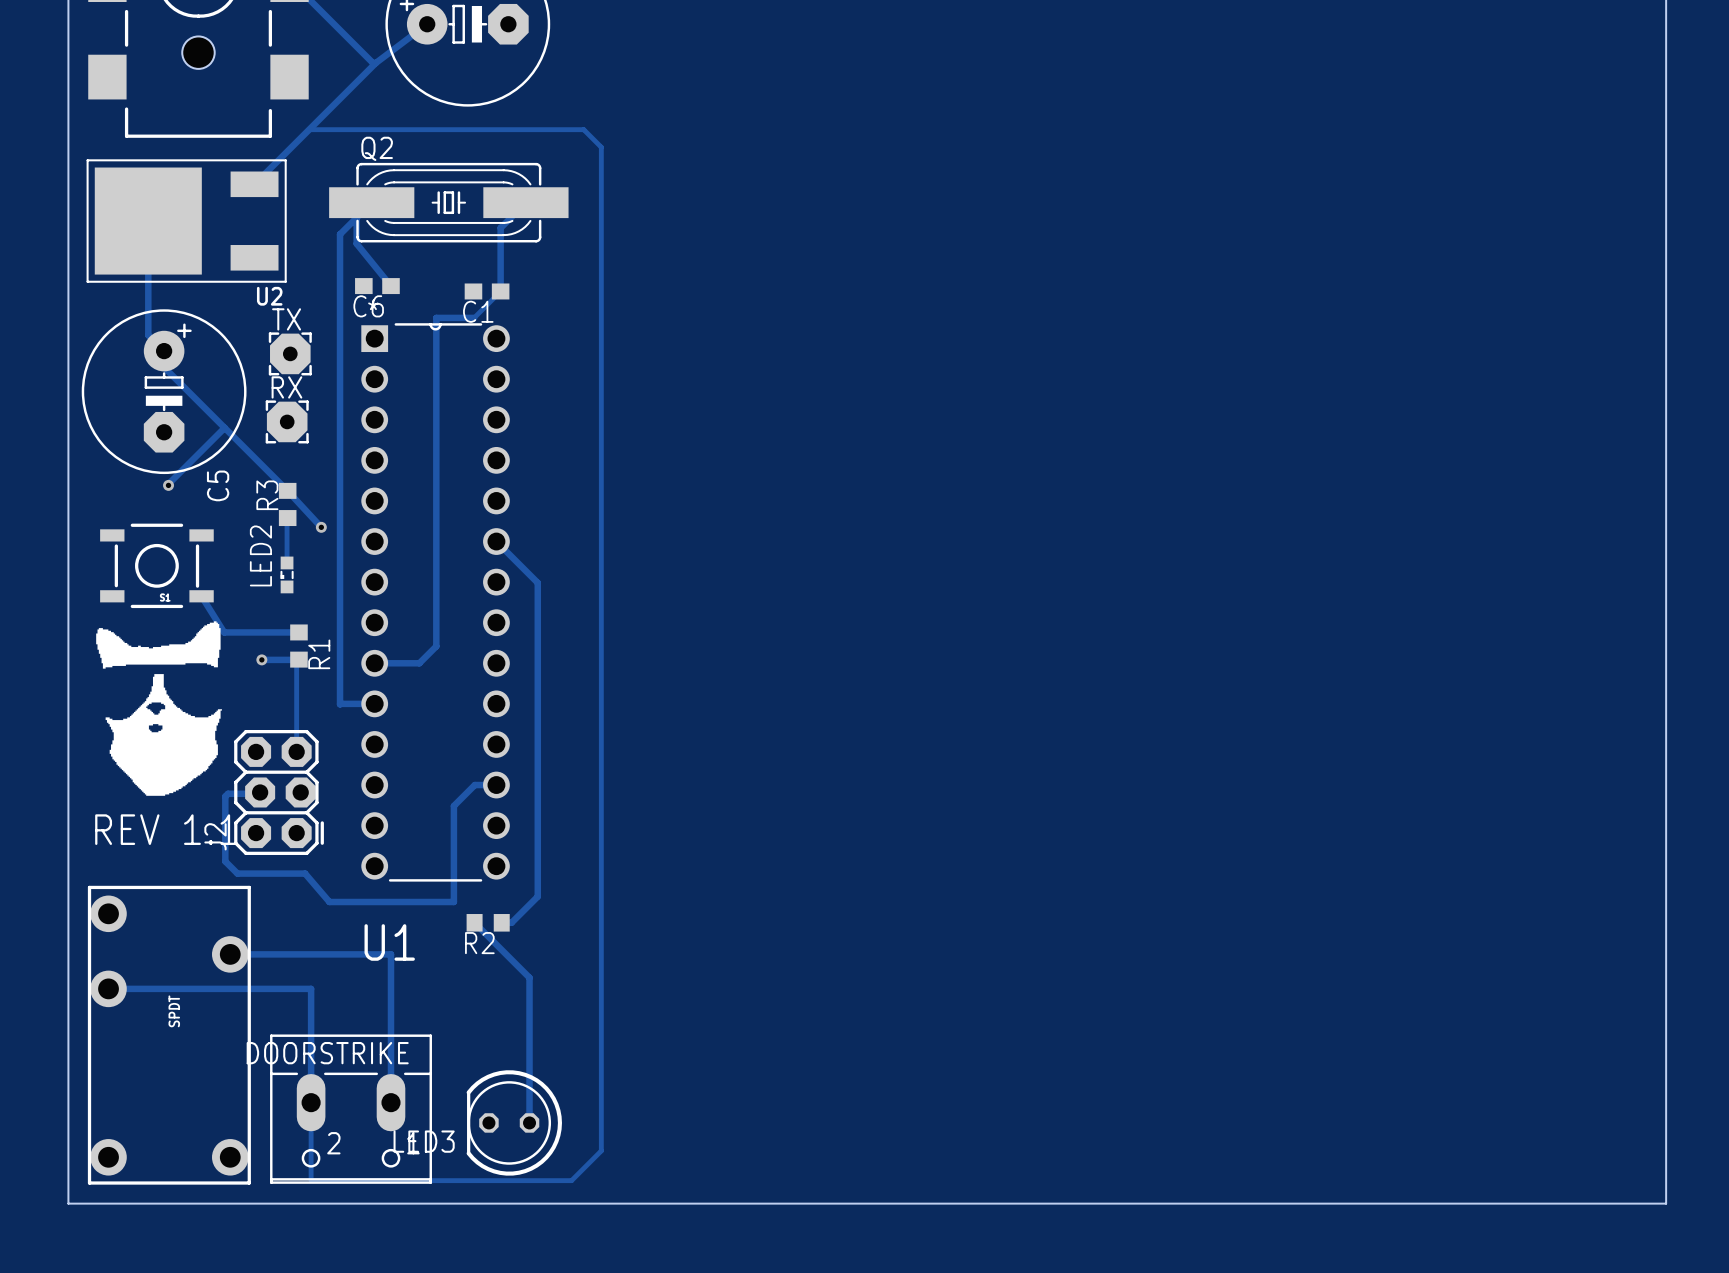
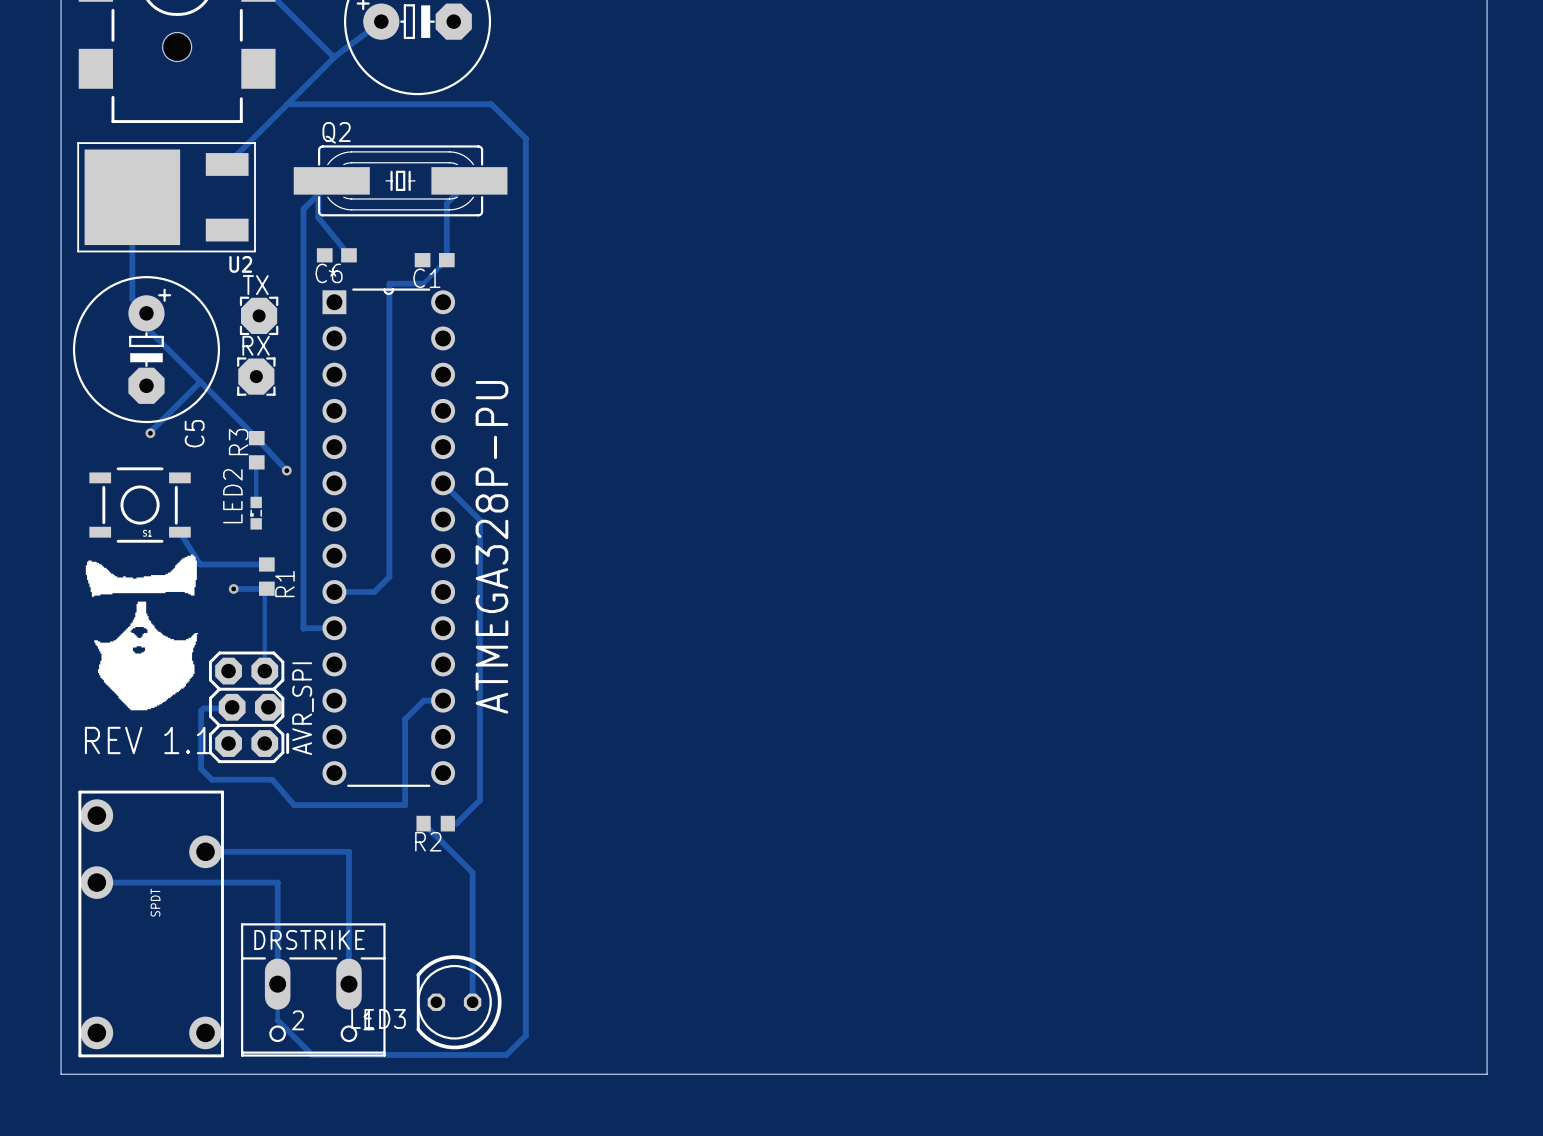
track: (254, 184) (309, 129) (583, 129) (601, 147) (601, 1150) (571, 1180) (311, 1180) (311, 1143) -> (287, 104) (491, 104) (525, 138) (525, 1035) (506, 1054) (312, 1054) (277, 1020)
J2 name: J2 (215, 836) -> AVR_SPI (303, 708)
U1 name: U1 (389, 942) -> ATMEGA328P-PU (491, 547)
DOORSTRIKE name: DOORSTRIKE (327, 1053) -> DRSTRIKE (309, 939)

